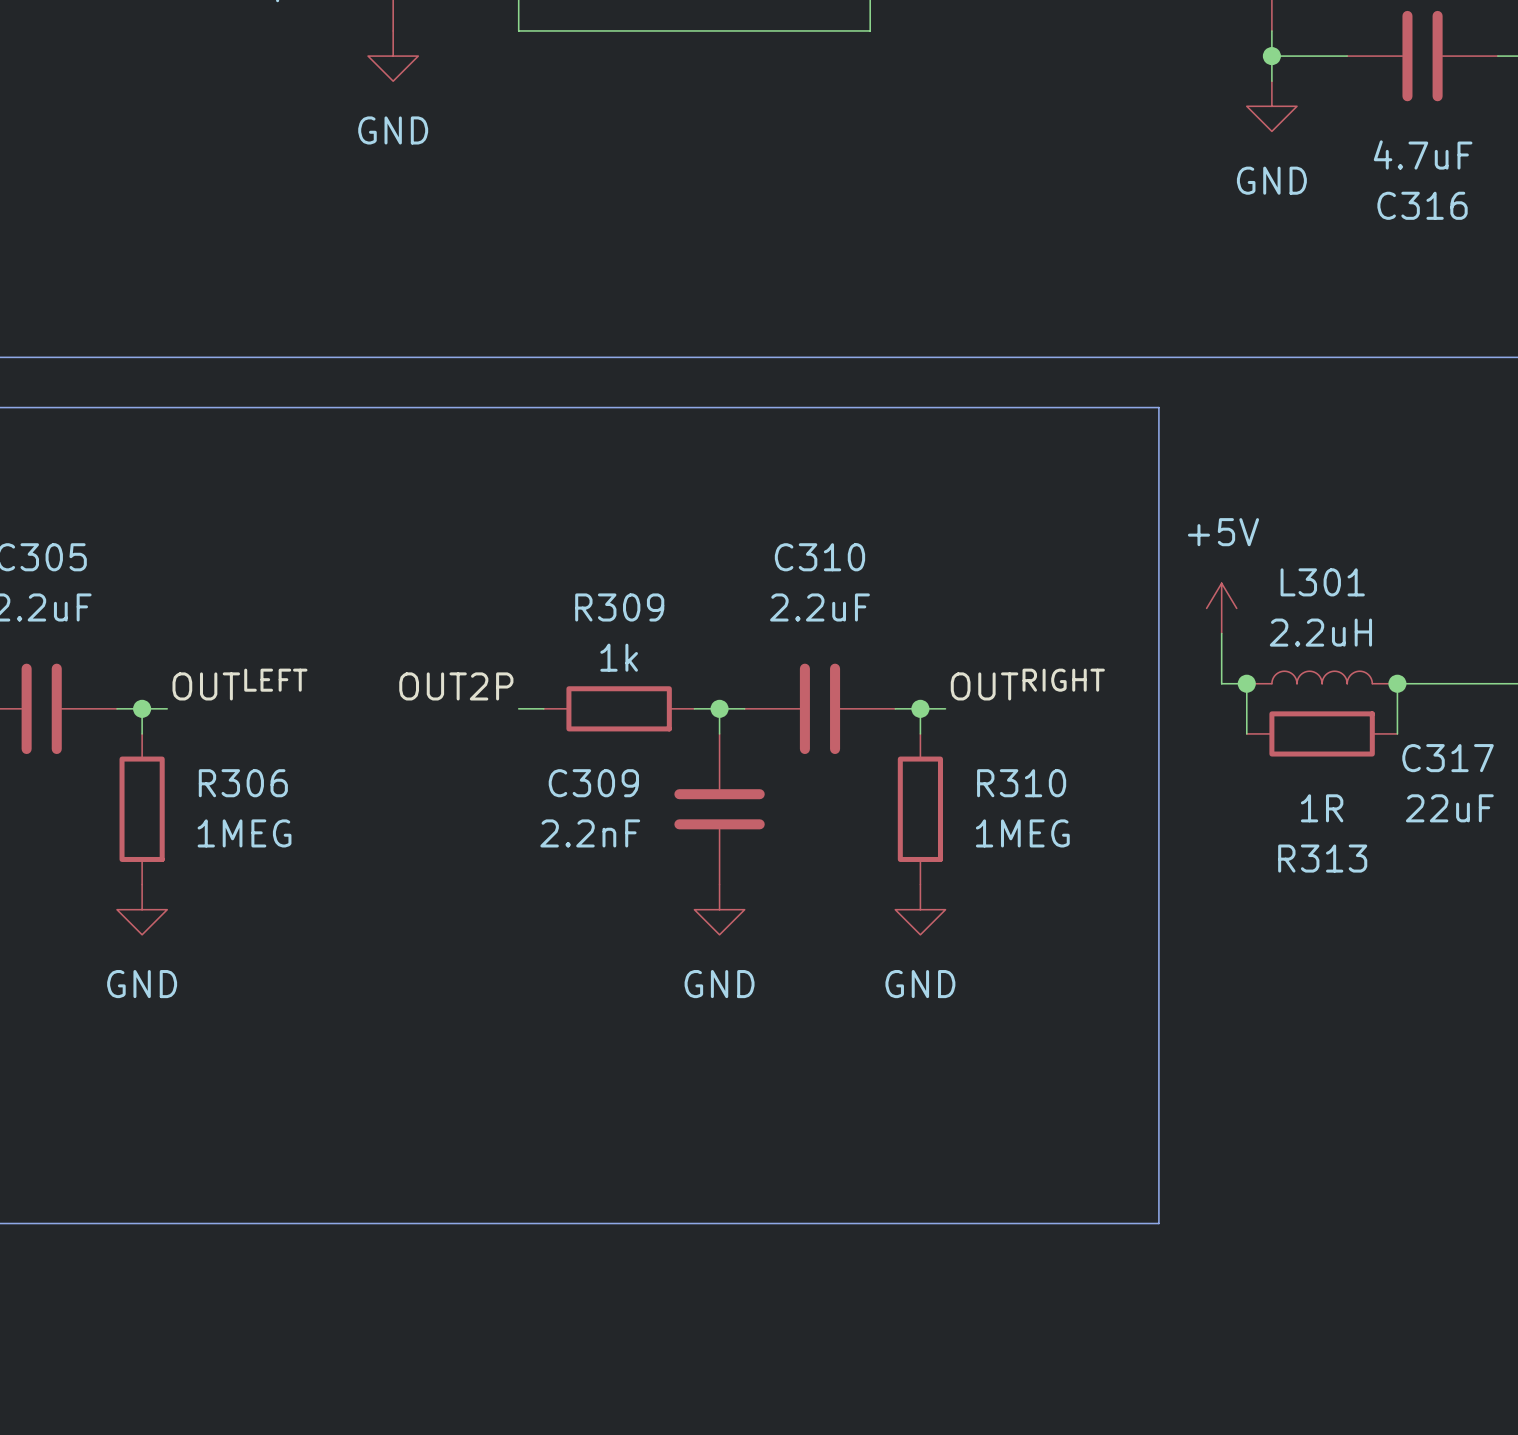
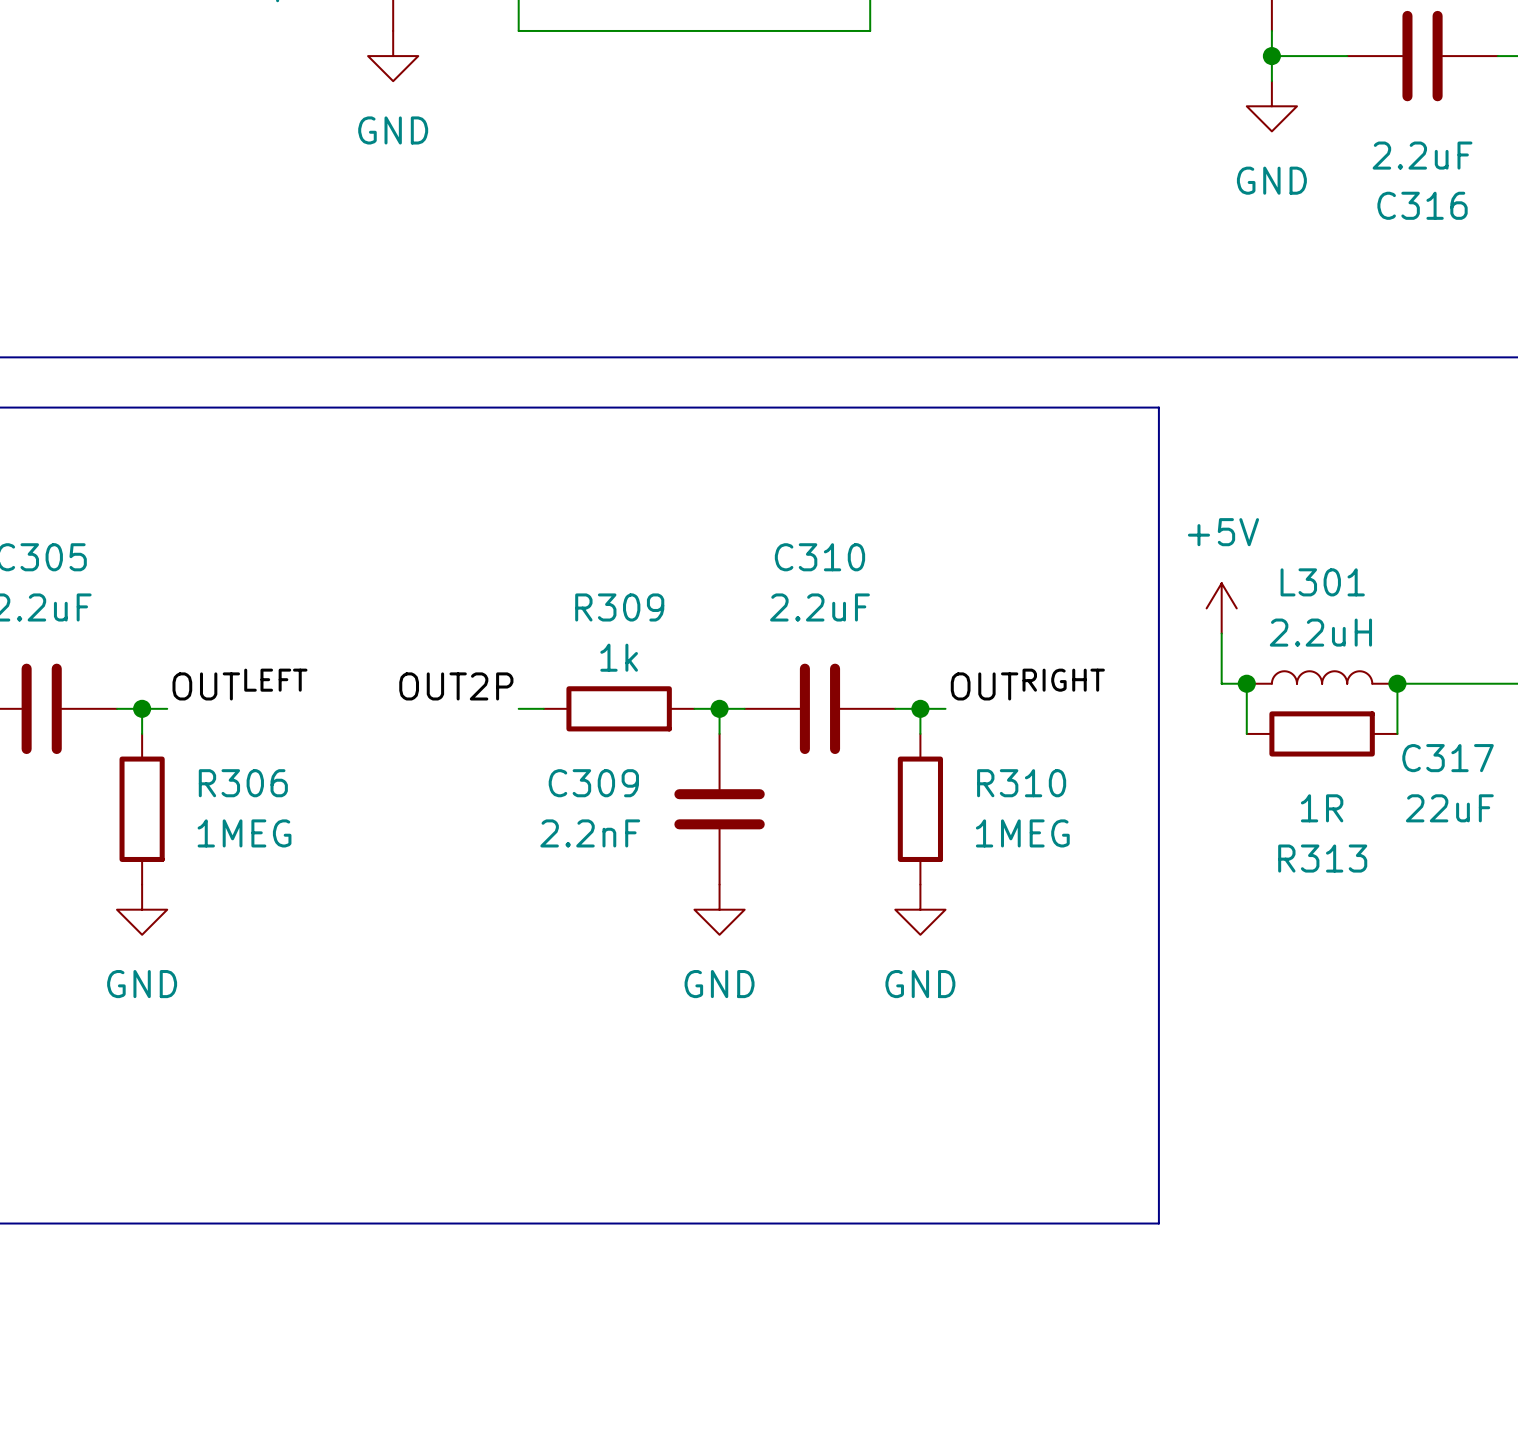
C316 value: 4.7uF (1423, 154) -> 2.2uF (1422, 155)

